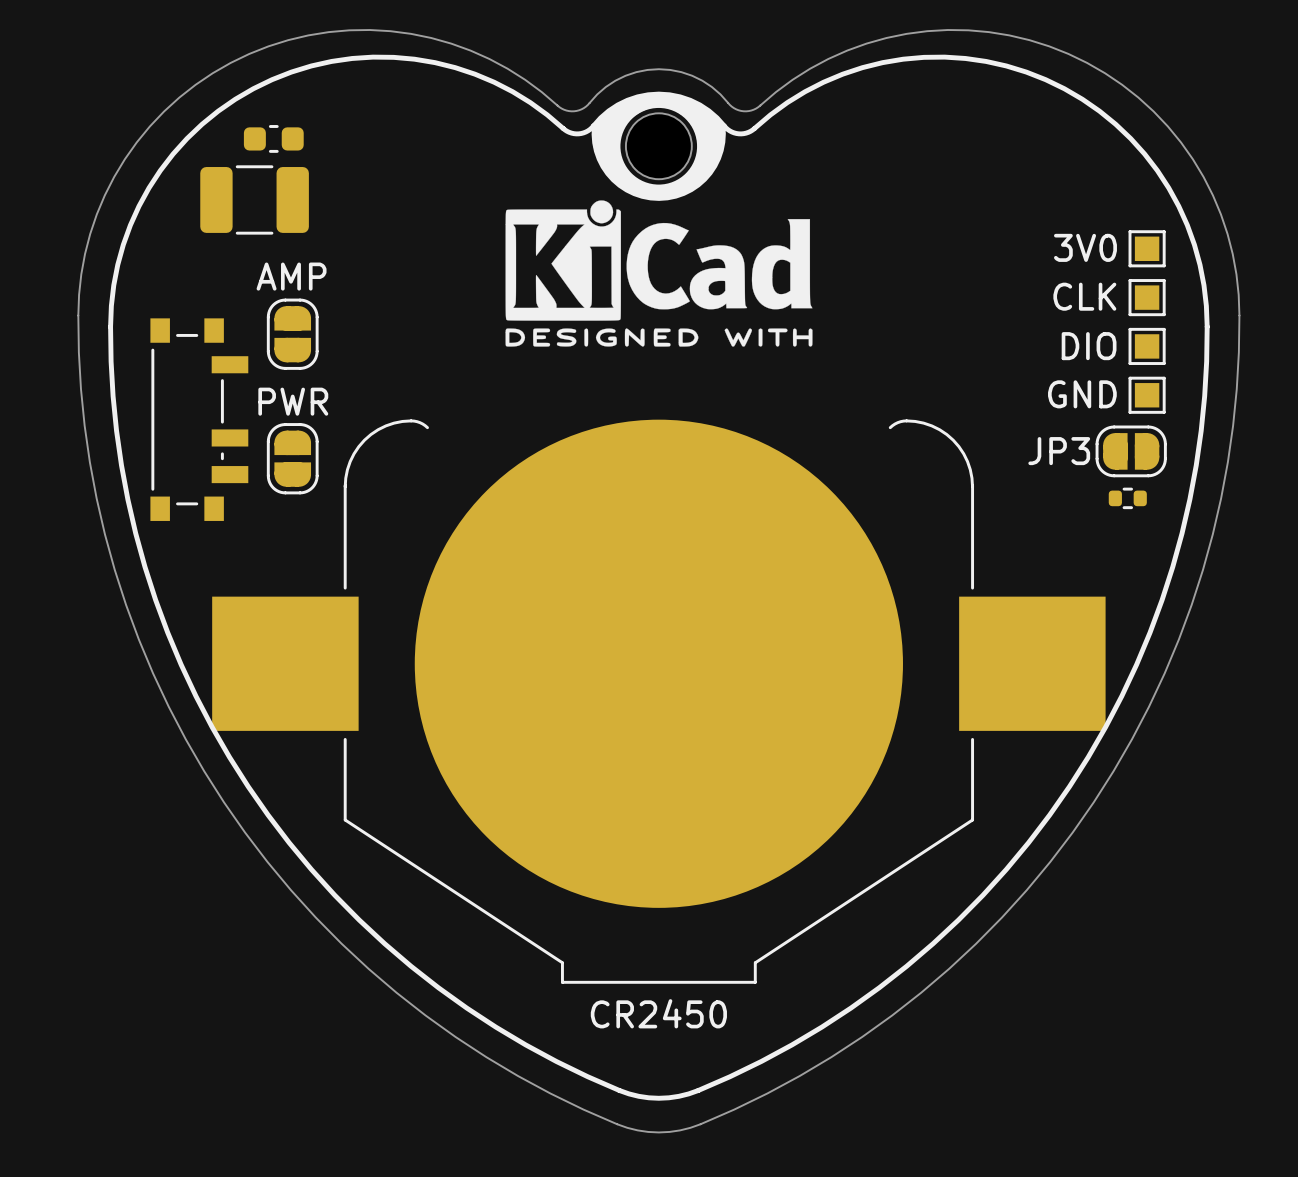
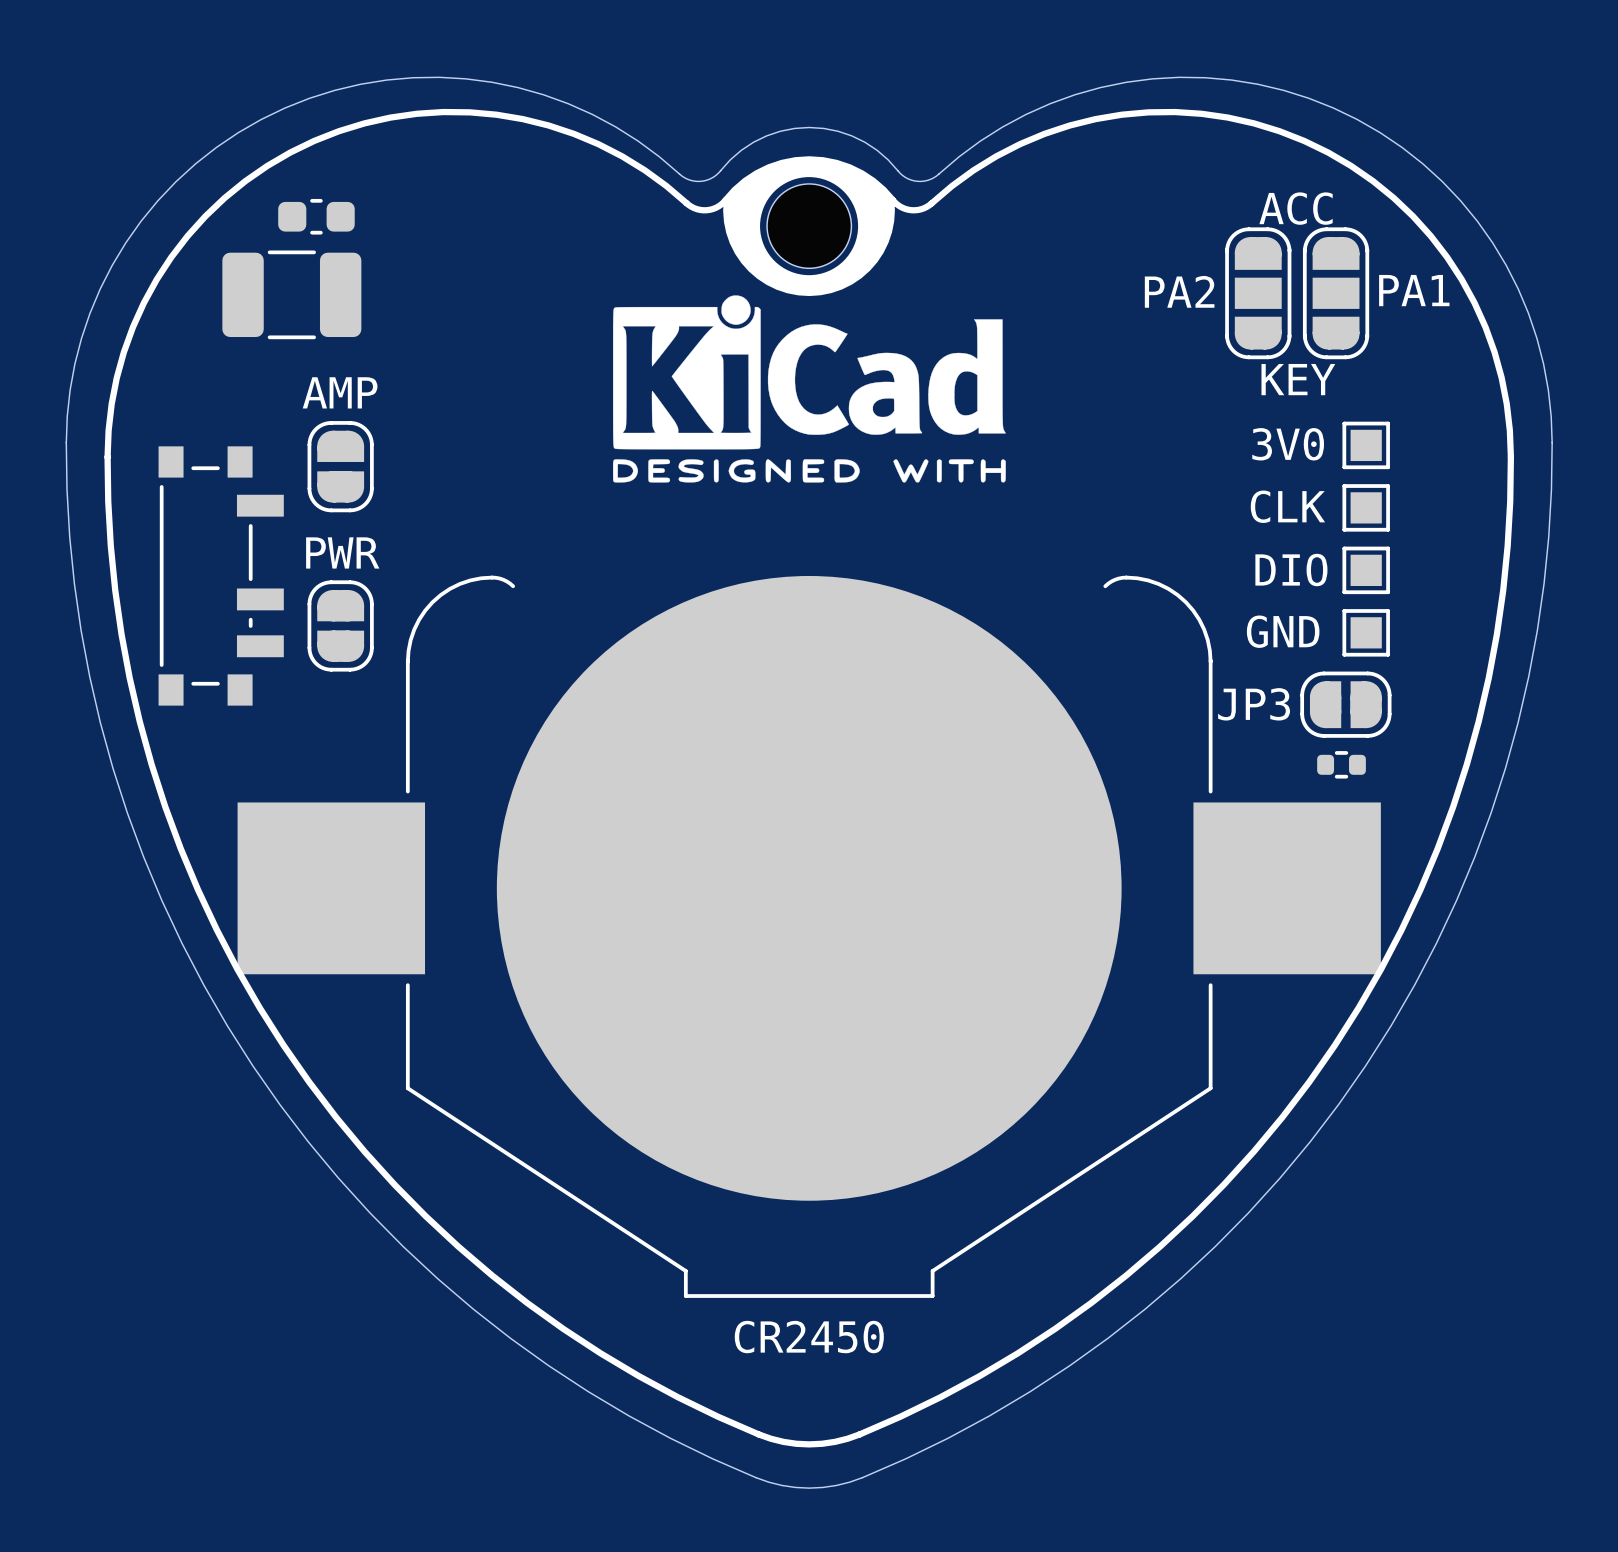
PA2: none -> (1258, 293)
PA1: none -> (1336, 293)
part position: (1147, 248) -> (1366, 445)
part position: (1147, 297) -> (1366, 507)
part position: (1147, 346) -> (1366, 570)
part position: (1147, 395) -> (1366, 632)
JP3 position: (1131, 451) -> (1345, 704)
part position: (1127, 498) -> (1341, 764)

